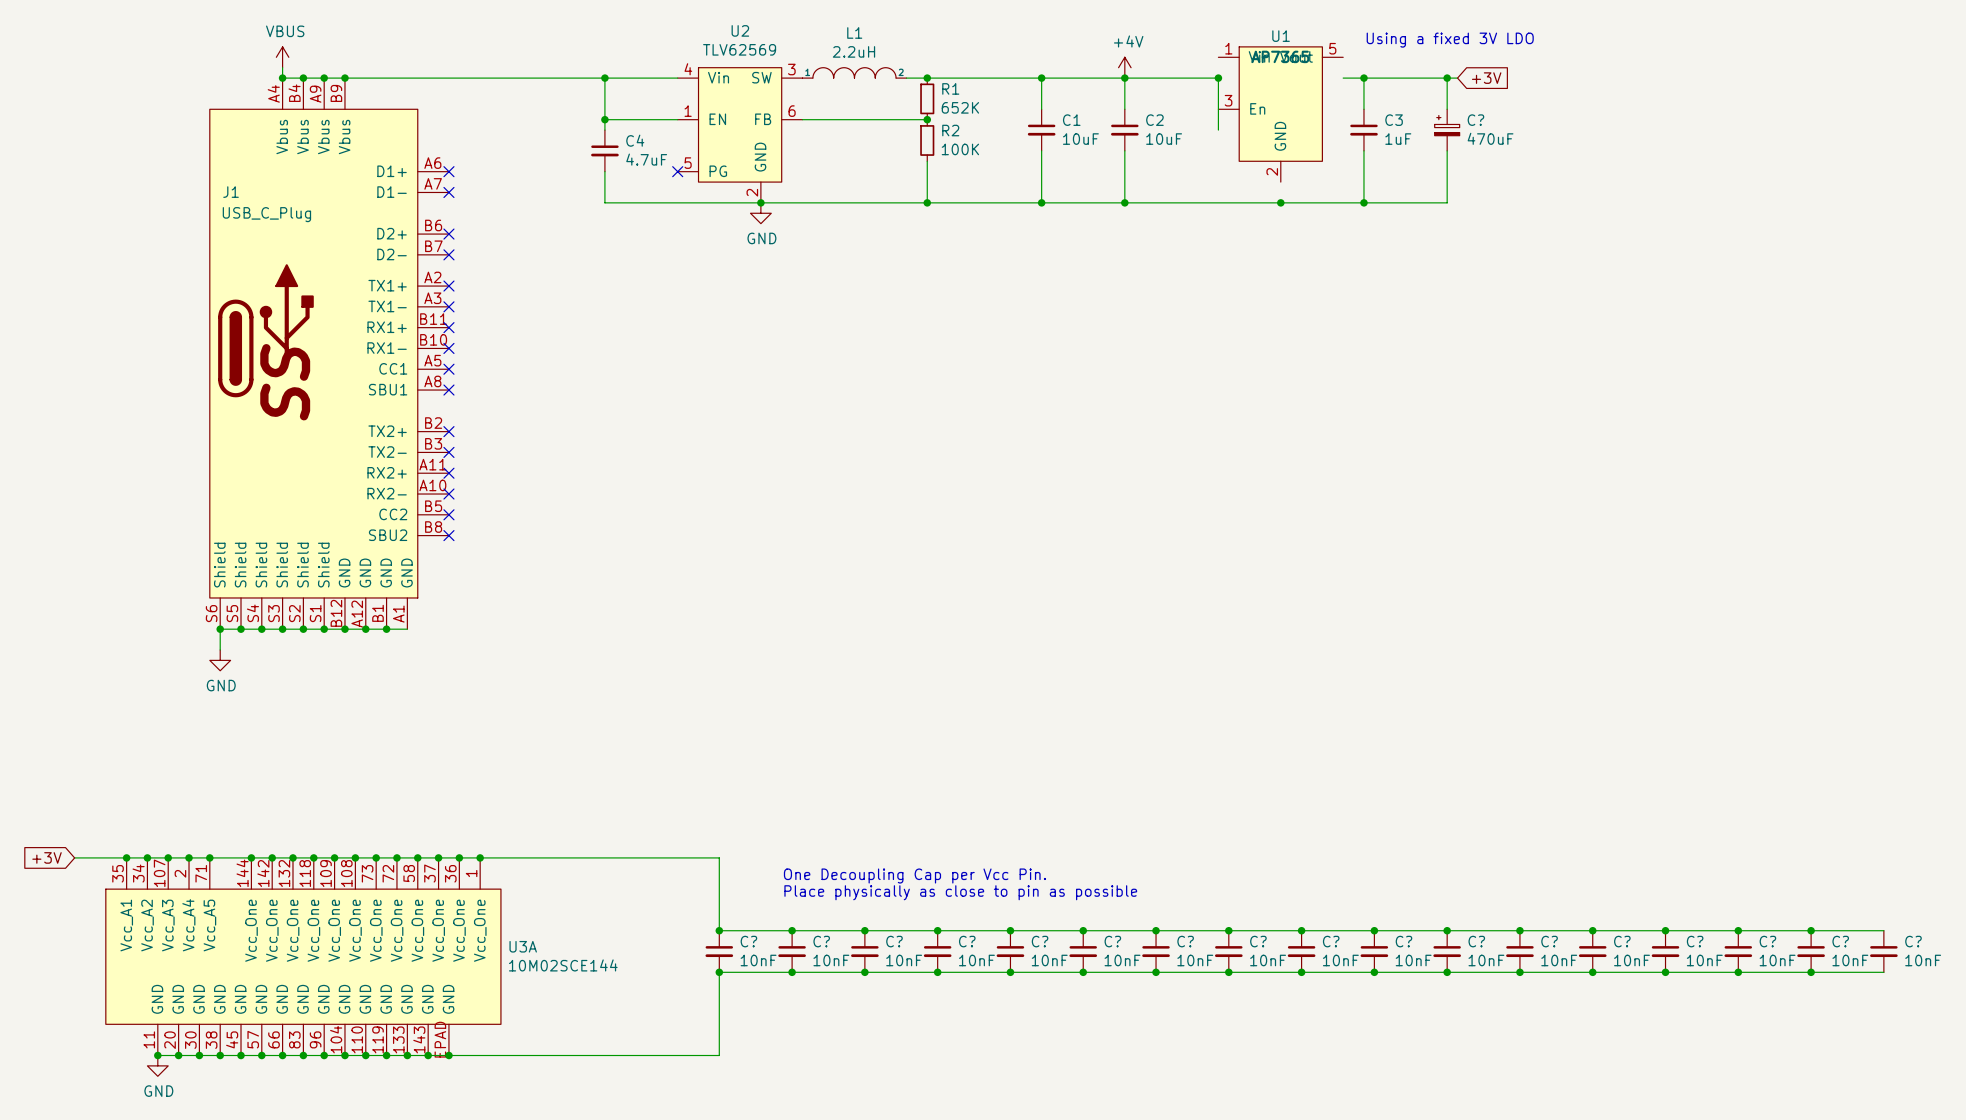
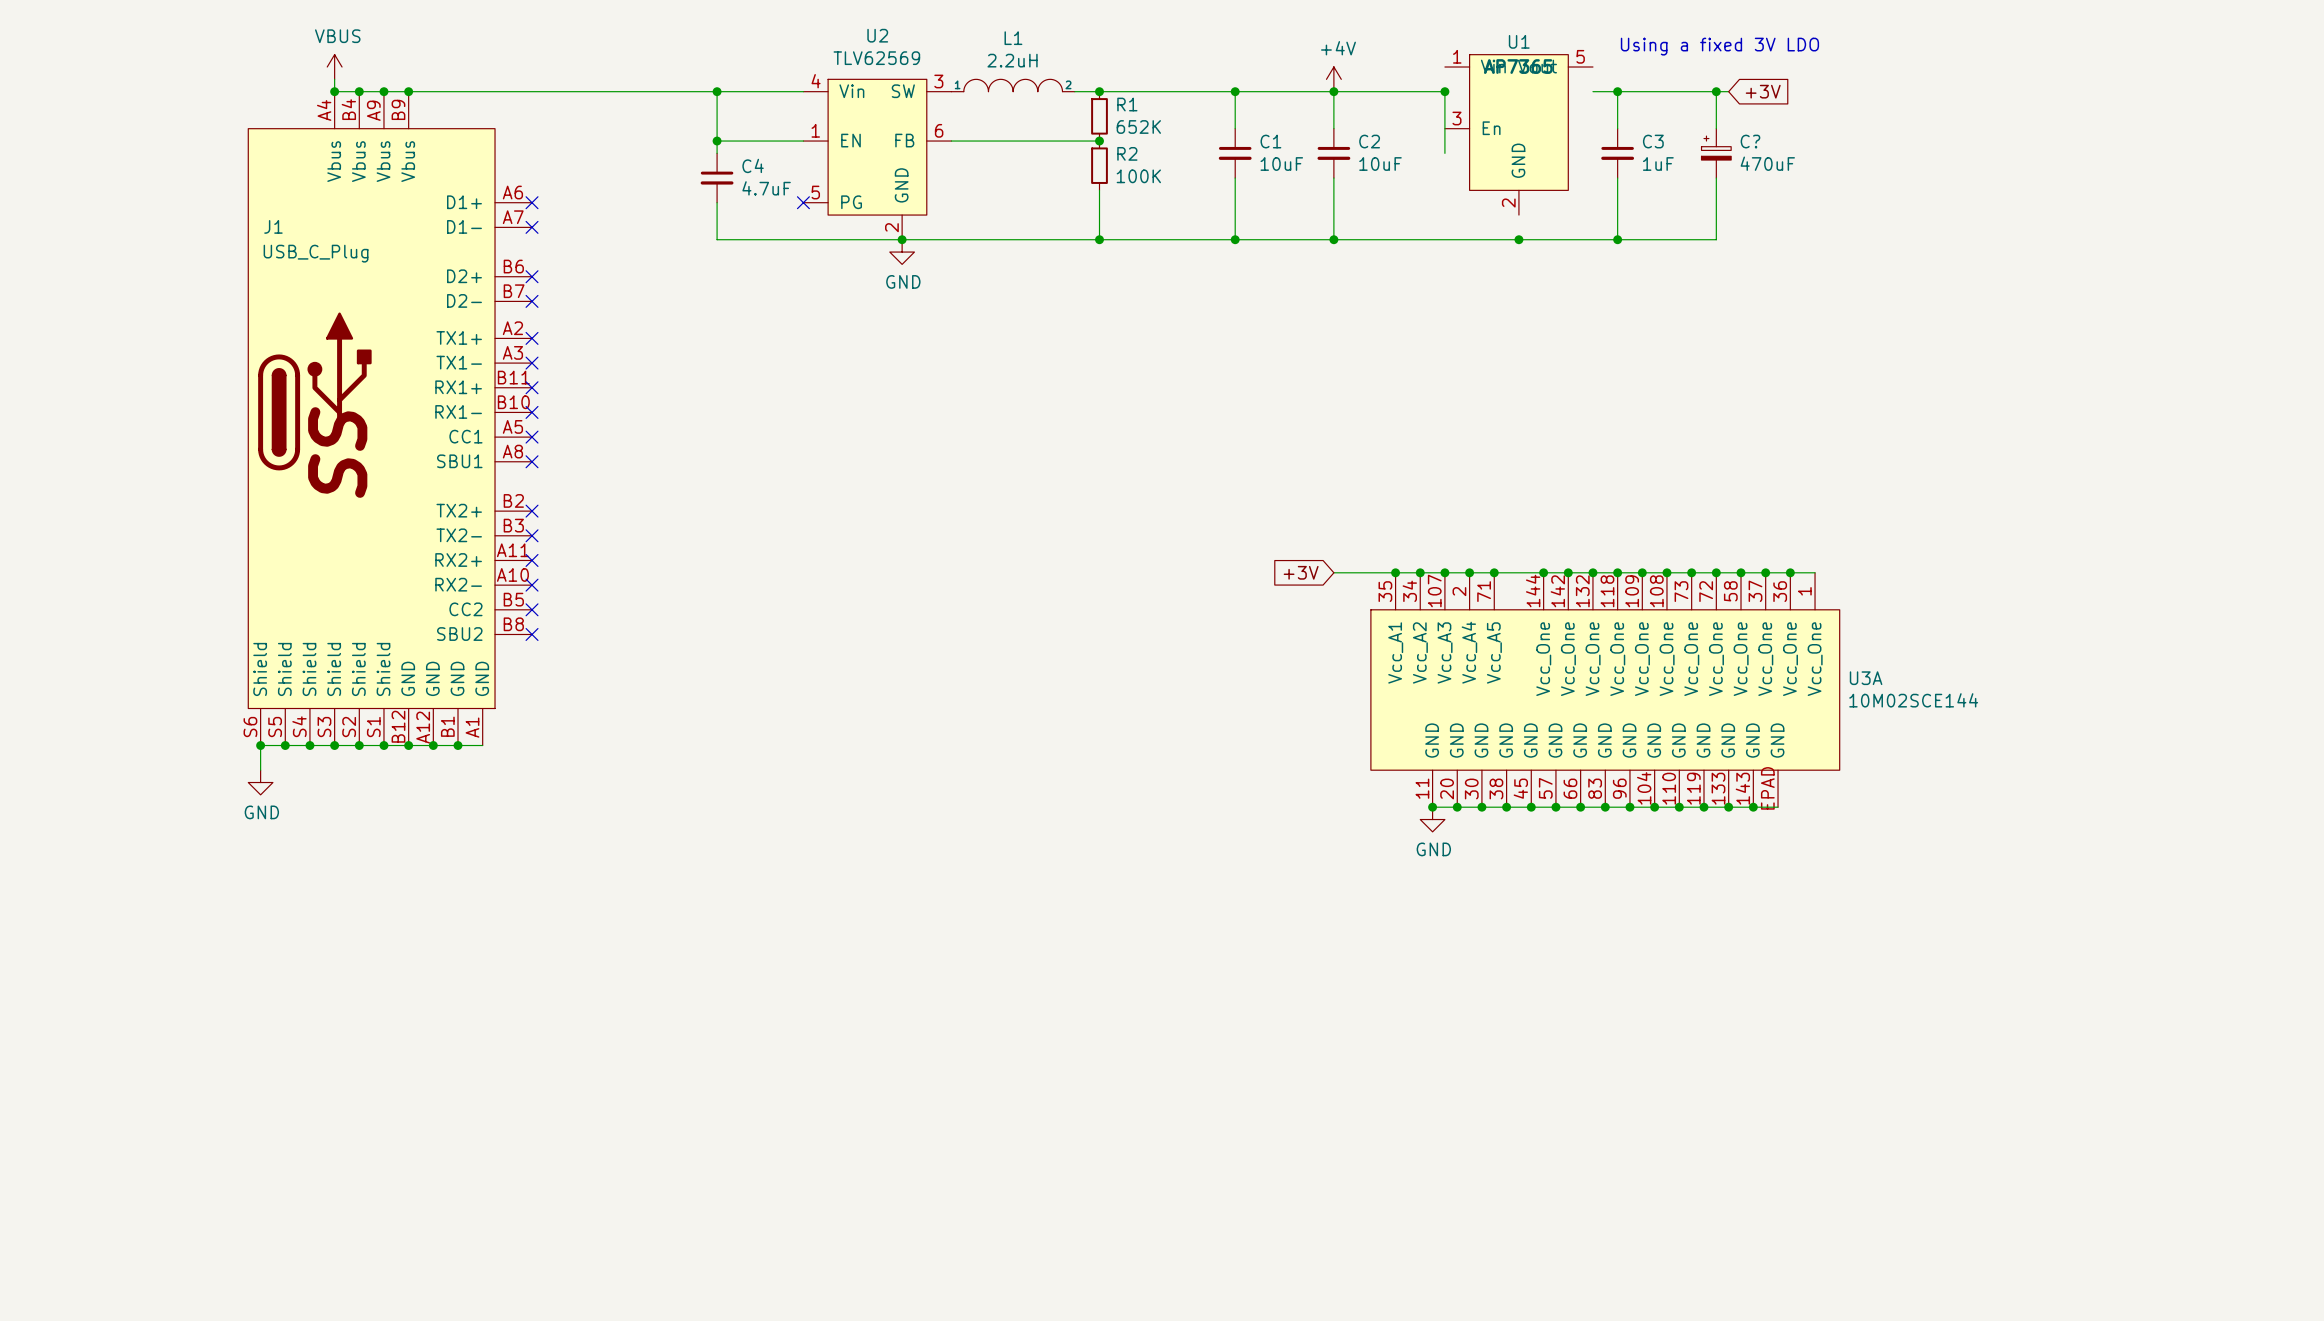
global label: none -> +3V (1301, 572)
wire: none -> (1333, 572) (1815, 572)
junction: none -> (1395, 572)
junction: none -> (1420, 572)
junction: none -> (1444, 572)
junction: none -> (1469, 572)
junction: none -> (1494, 572)
junction: none -> (1543, 572)
junction: none -> (1568, 572)
junction: none -> (1592, 572)
junction: none -> (1617, 572)
junction: none -> (1642, 572)
junction: none -> (1666, 572)
junction: none -> (1691, 572)
junction: none -> (1716, 572)
junction: none -> (1741, 572)
junction: none -> (1765, 572)
junction: none -> (1790, 572)
wire: none -> (1432, 807) (1778, 807)
junction: none -> (1432, 807)
junction: none -> (1457, 807)
junction: none -> (1481, 807)
junction: none -> (1506, 807)
junction: none -> (1531, 807)
junction: none -> (1555, 807)
junction: none -> (1580, 807)
junction: none -> (1605, 807)
junction: none -> (1629, 807)
junction: none -> (1654, 807)
junction: none -> (1679, 807)
junction: none -> (1703, 807)
junction: none -> (1728, 807)
junction: none -> (1753, 807)
power symbol: none -> GND (1432, 819)
global label: +3V (47, 857) -> none
wire: (74, 857) (719, 857) (719, 930) (1883, 930) -> none
junction: (126, 857) -> none
junction: (147, 857) -> none
junction: (168, 857) -> none
junction: (189, 857) -> none
junction: (209, 857) -> none
junction: (251, 857) -> none
junction: (272, 857) -> none
junction: (292, 857) -> none
junction: (313, 857) -> none
junction: (334, 857) -> none
junction: (355, 857) -> none
junction: (376, 857) -> none
junction: (396, 857) -> none
junction: (417, 857) -> none
junction: (438, 857) -> none
junction: (459, 857) -> none
junction: (480, 857) -> none
text: One Decoupling Cap per Vcc Pin. (914, 876) -> none
text: Place physically as close to pin as possible (960, 892) -> none
junction: (719, 930) -> none
junction: (792, 930) -> none
junction: (864, 930) -> none
junction: (937, 930) -> none
junction: (1010, 930) -> none
junction: (1083, 930) -> none
junction: (1156, 930) -> none
junction: (1228, 930) -> none
junction: (1301, 930) -> none
junction: (1374, 930) -> none
junction: (1447, 930) -> none
junction: (1519, 930) -> none
junction: (1592, 930) -> none
junction: (1665, 930) -> none
junction: (1738, 930) -> none
junction: (1811, 930) -> none
C?: 10nF (719, 951) -> none
C?: 10nF (792, 951) -> none
C?: 10nF (864, 951) -> none
C?: 10nF (937, 951) -> none
C?: 10nF (1010, 951) -> none
C?: 10nF (1083, 951) -> none
C?: 10nF (1156, 951) -> none
C?: 10nF (1228, 951) -> none
C?: 10nF (1301, 951) -> none
C?: 10nF (1374, 951) -> none
C?: 10nF (1447, 951) -> none
C?: 10nF (1519, 951) -> none
C?: 10nF (1592, 951) -> none
C?: 10nF (1665, 951) -> none
C?: 10nF (1738, 951) -> none
C?: 10nF (1811, 951) -> none
C?: 10nF (1883, 951) -> none
U3A position: (303, 956) -> (1605, 690)
junction: (719, 972) -> none
junction: (792, 972) -> none
junction: (864, 972) -> none
junction: (937, 972) -> none
junction: (1010, 972) -> none
junction: (1083, 972) -> none
junction: (1156, 972) -> none
junction: (1228, 972) -> none
junction: (1301, 972) -> none
junction: (1374, 972) -> none
junction: (1447, 972) -> none
junction: (1519, 972) -> none
junction: (1592, 972) -> none
junction: (1665, 972) -> none
junction: (1738, 972) -> none
junction: (1811, 972) -> none
wire: (1883, 972) (719, 972) (719, 1055) (157, 1055) -> none
junction: (157, 1055) -> none
junction: (178, 1055) -> none
junction: (199, 1055) -> none
junction: (220, 1055) -> none
junction: (241, 1055) -> none
junction: (261, 1055) -> none
junction: (282, 1055) -> none
junction: (303, 1055) -> none
junction: (324, 1055) -> none
junction: (344, 1055) -> none
junction: (365, 1055) -> none
junction: (386, 1055) -> none
junction: (407, 1055) -> none
junction: (428, 1055) -> none
junction: (448, 1055) -> none
power symbol: GND (157, 1065) -> none

